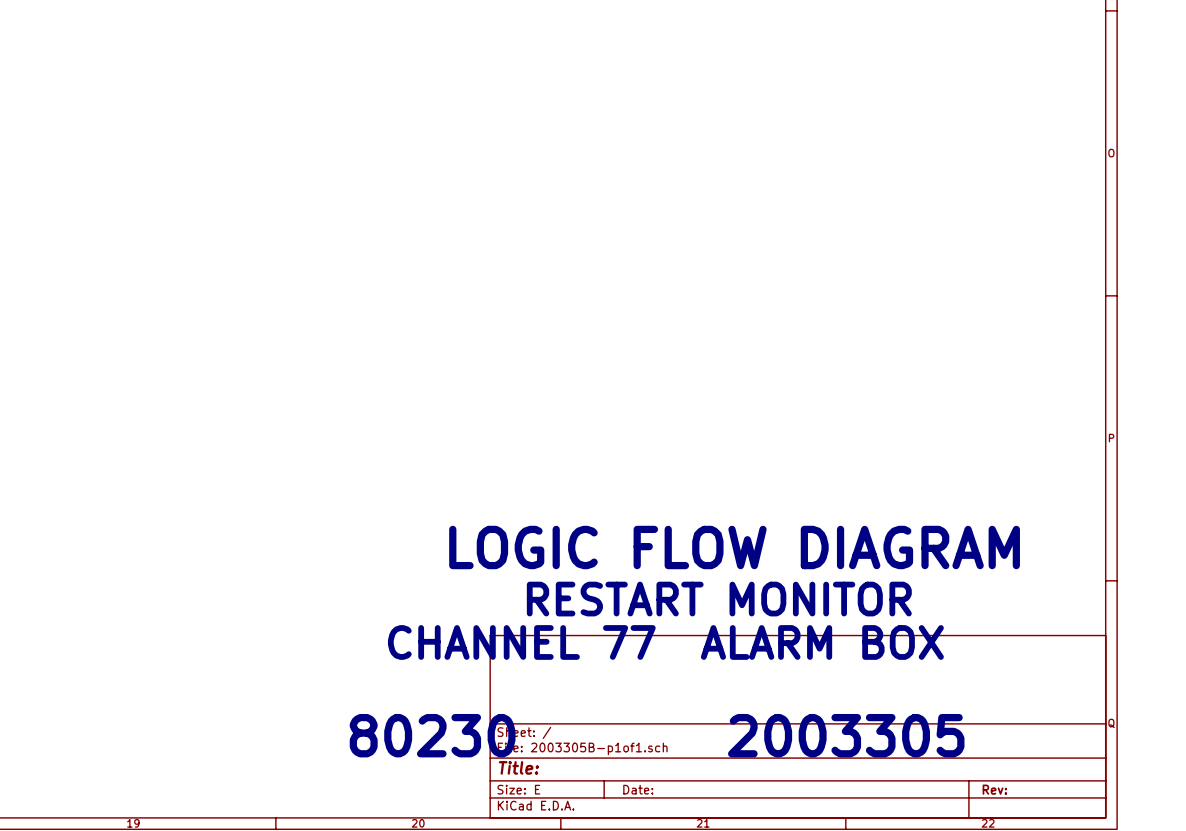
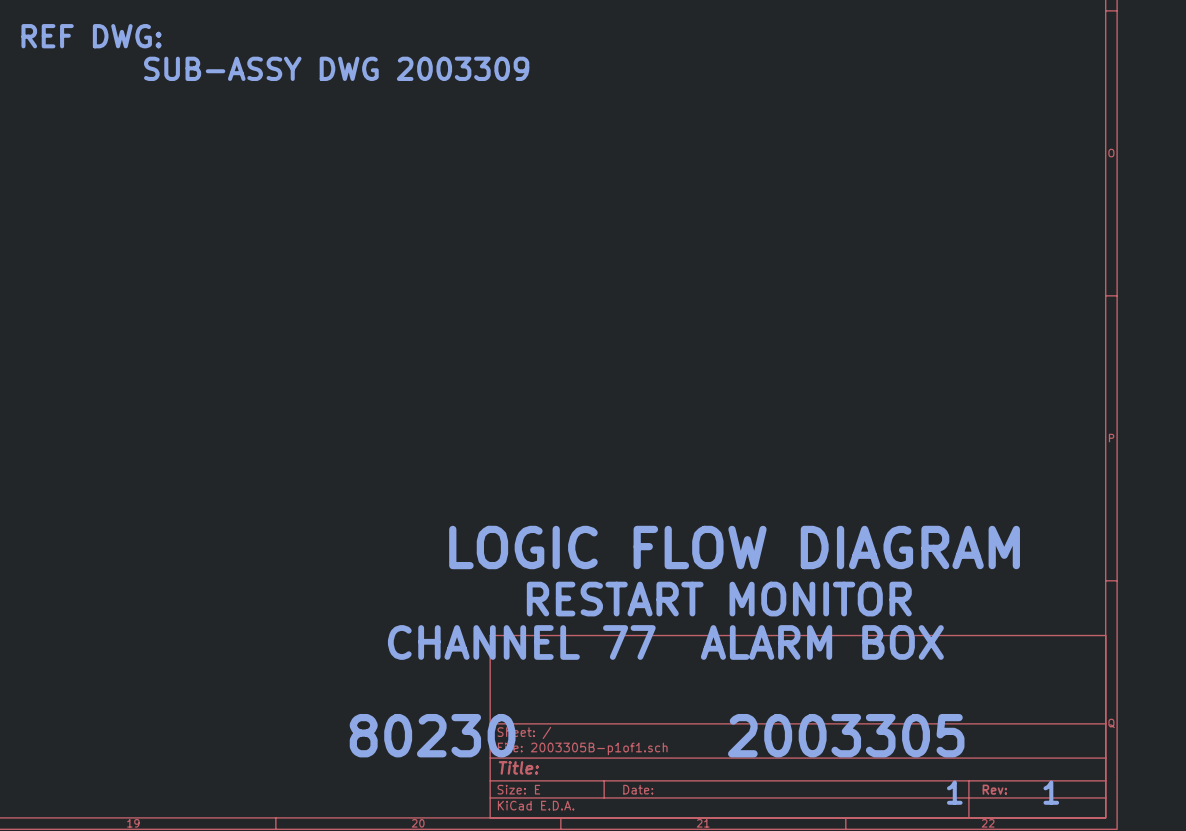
text: none -> REF DWG: (91, 36)
text: none -> SUB-ASSY DWG 2003309 (336, 68)
text: none -> 1 1 (1003, 792)

